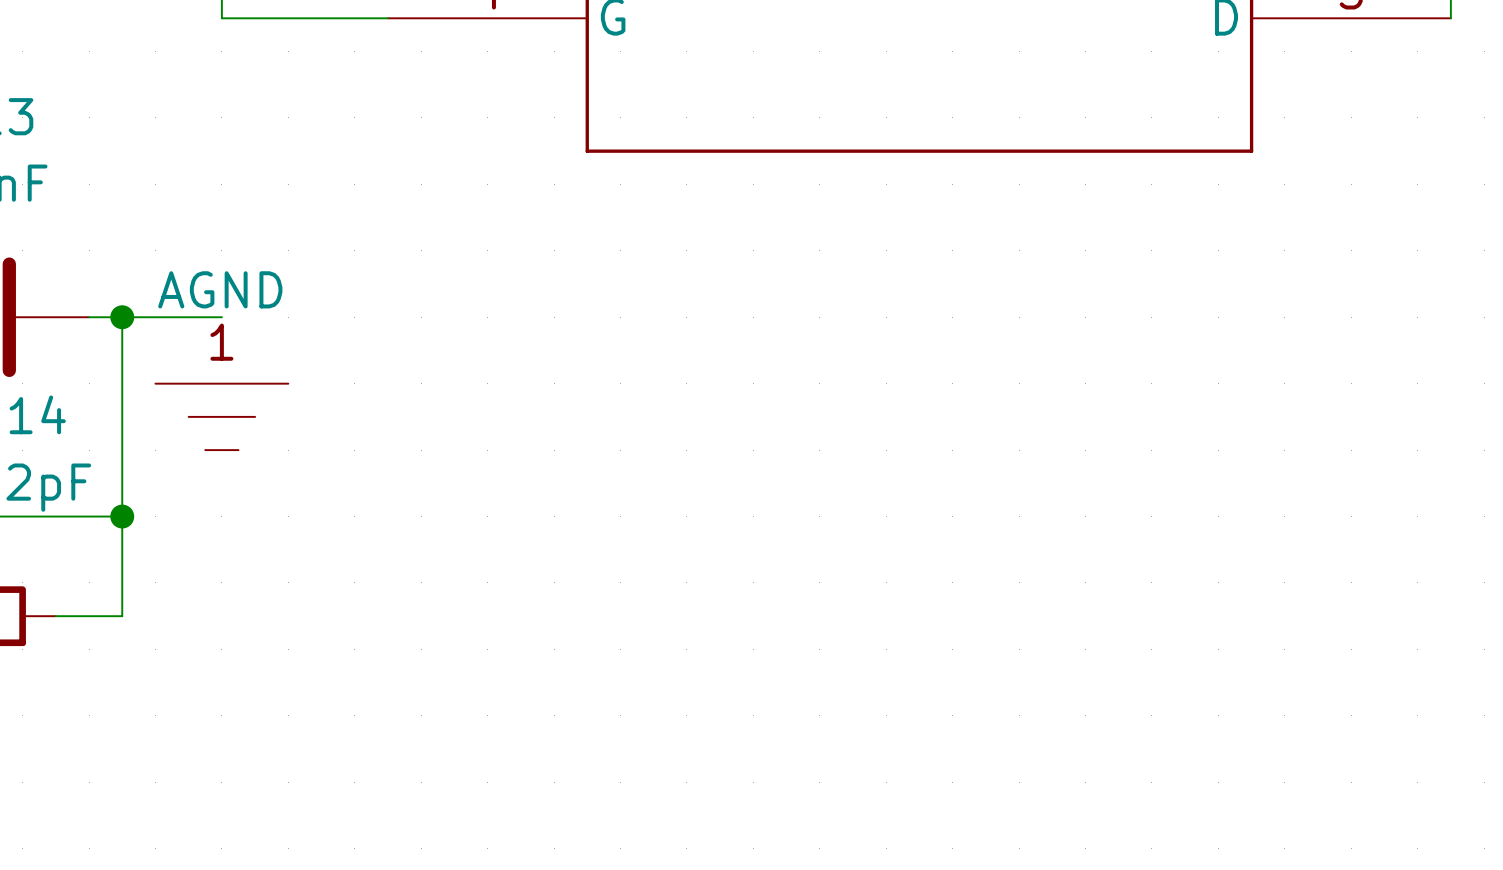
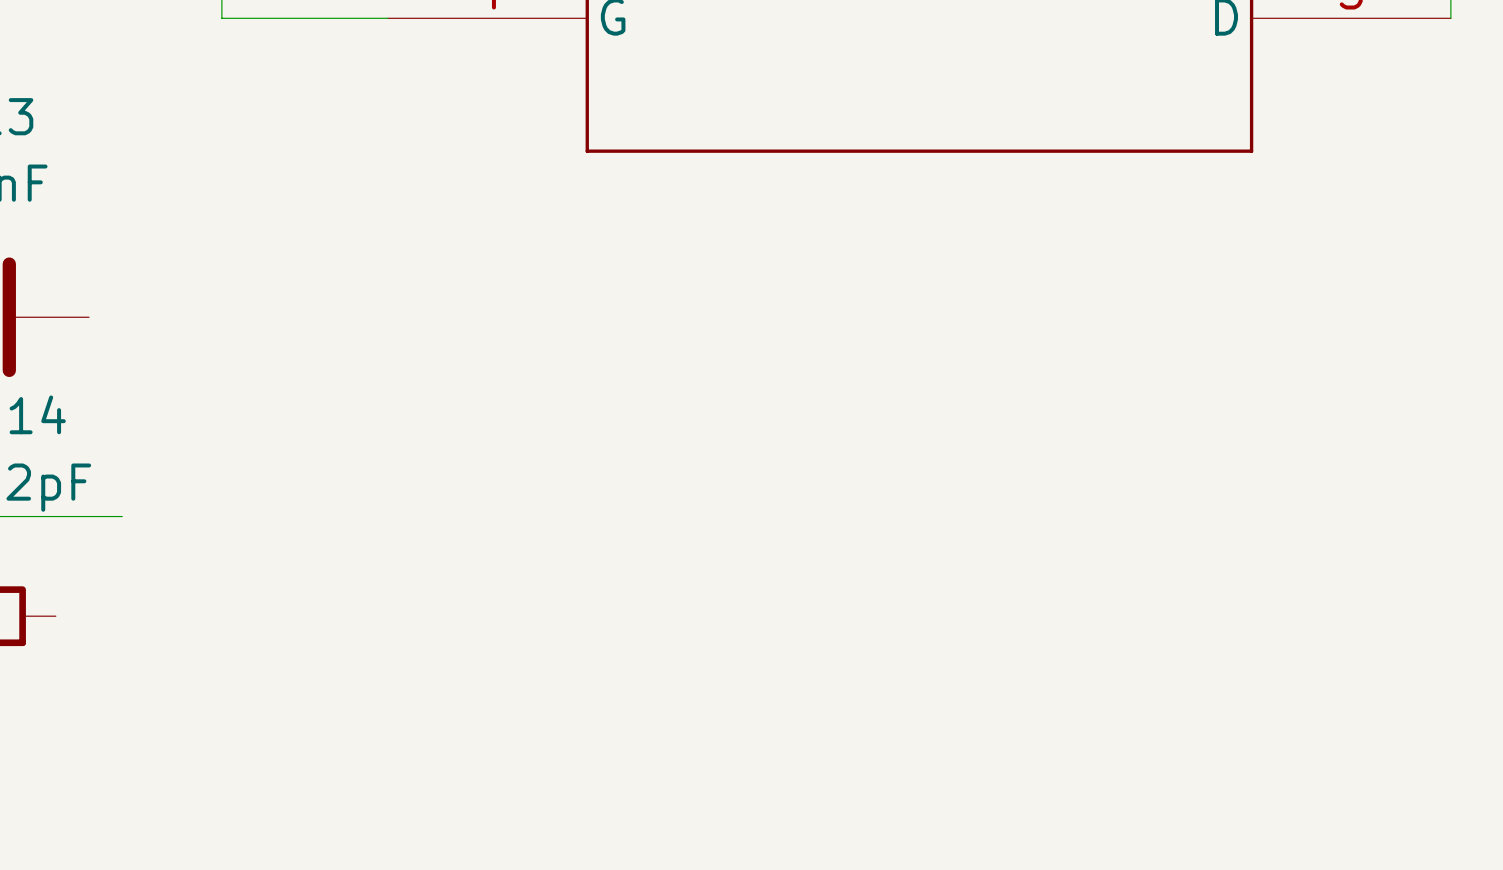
wire: (89, 317) (221, 317) -> none
wire: (122, 317) (122, 616) (55, 616) -> none
junction: (122, 317) -> none
power symbol: (221, 416) -> none
junction: (122, 516) -> none

